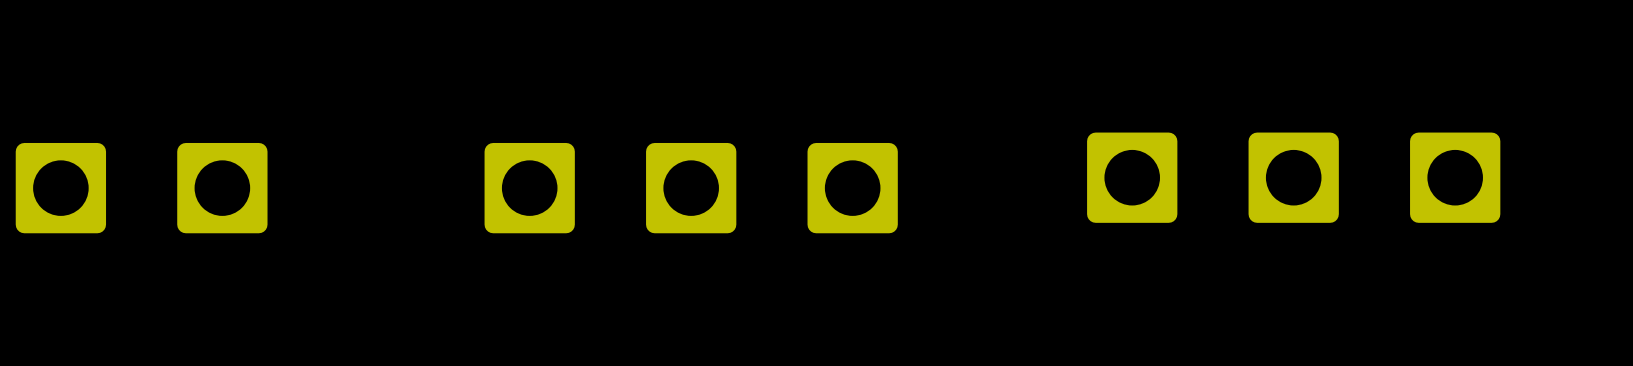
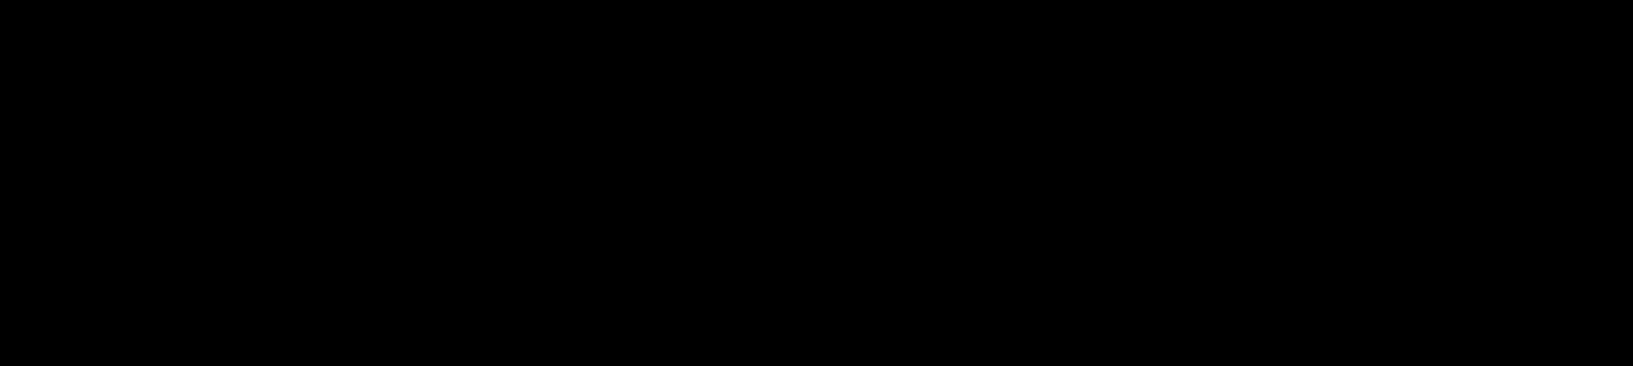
part: (1132, 177) -> none
part: (1293, 177) -> none
part: (1455, 177) -> none
part: (60, 188) -> none
part: (222, 188) -> none
part: (529, 188) -> none
part: (691, 188) -> none
part: (852, 188) -> none

